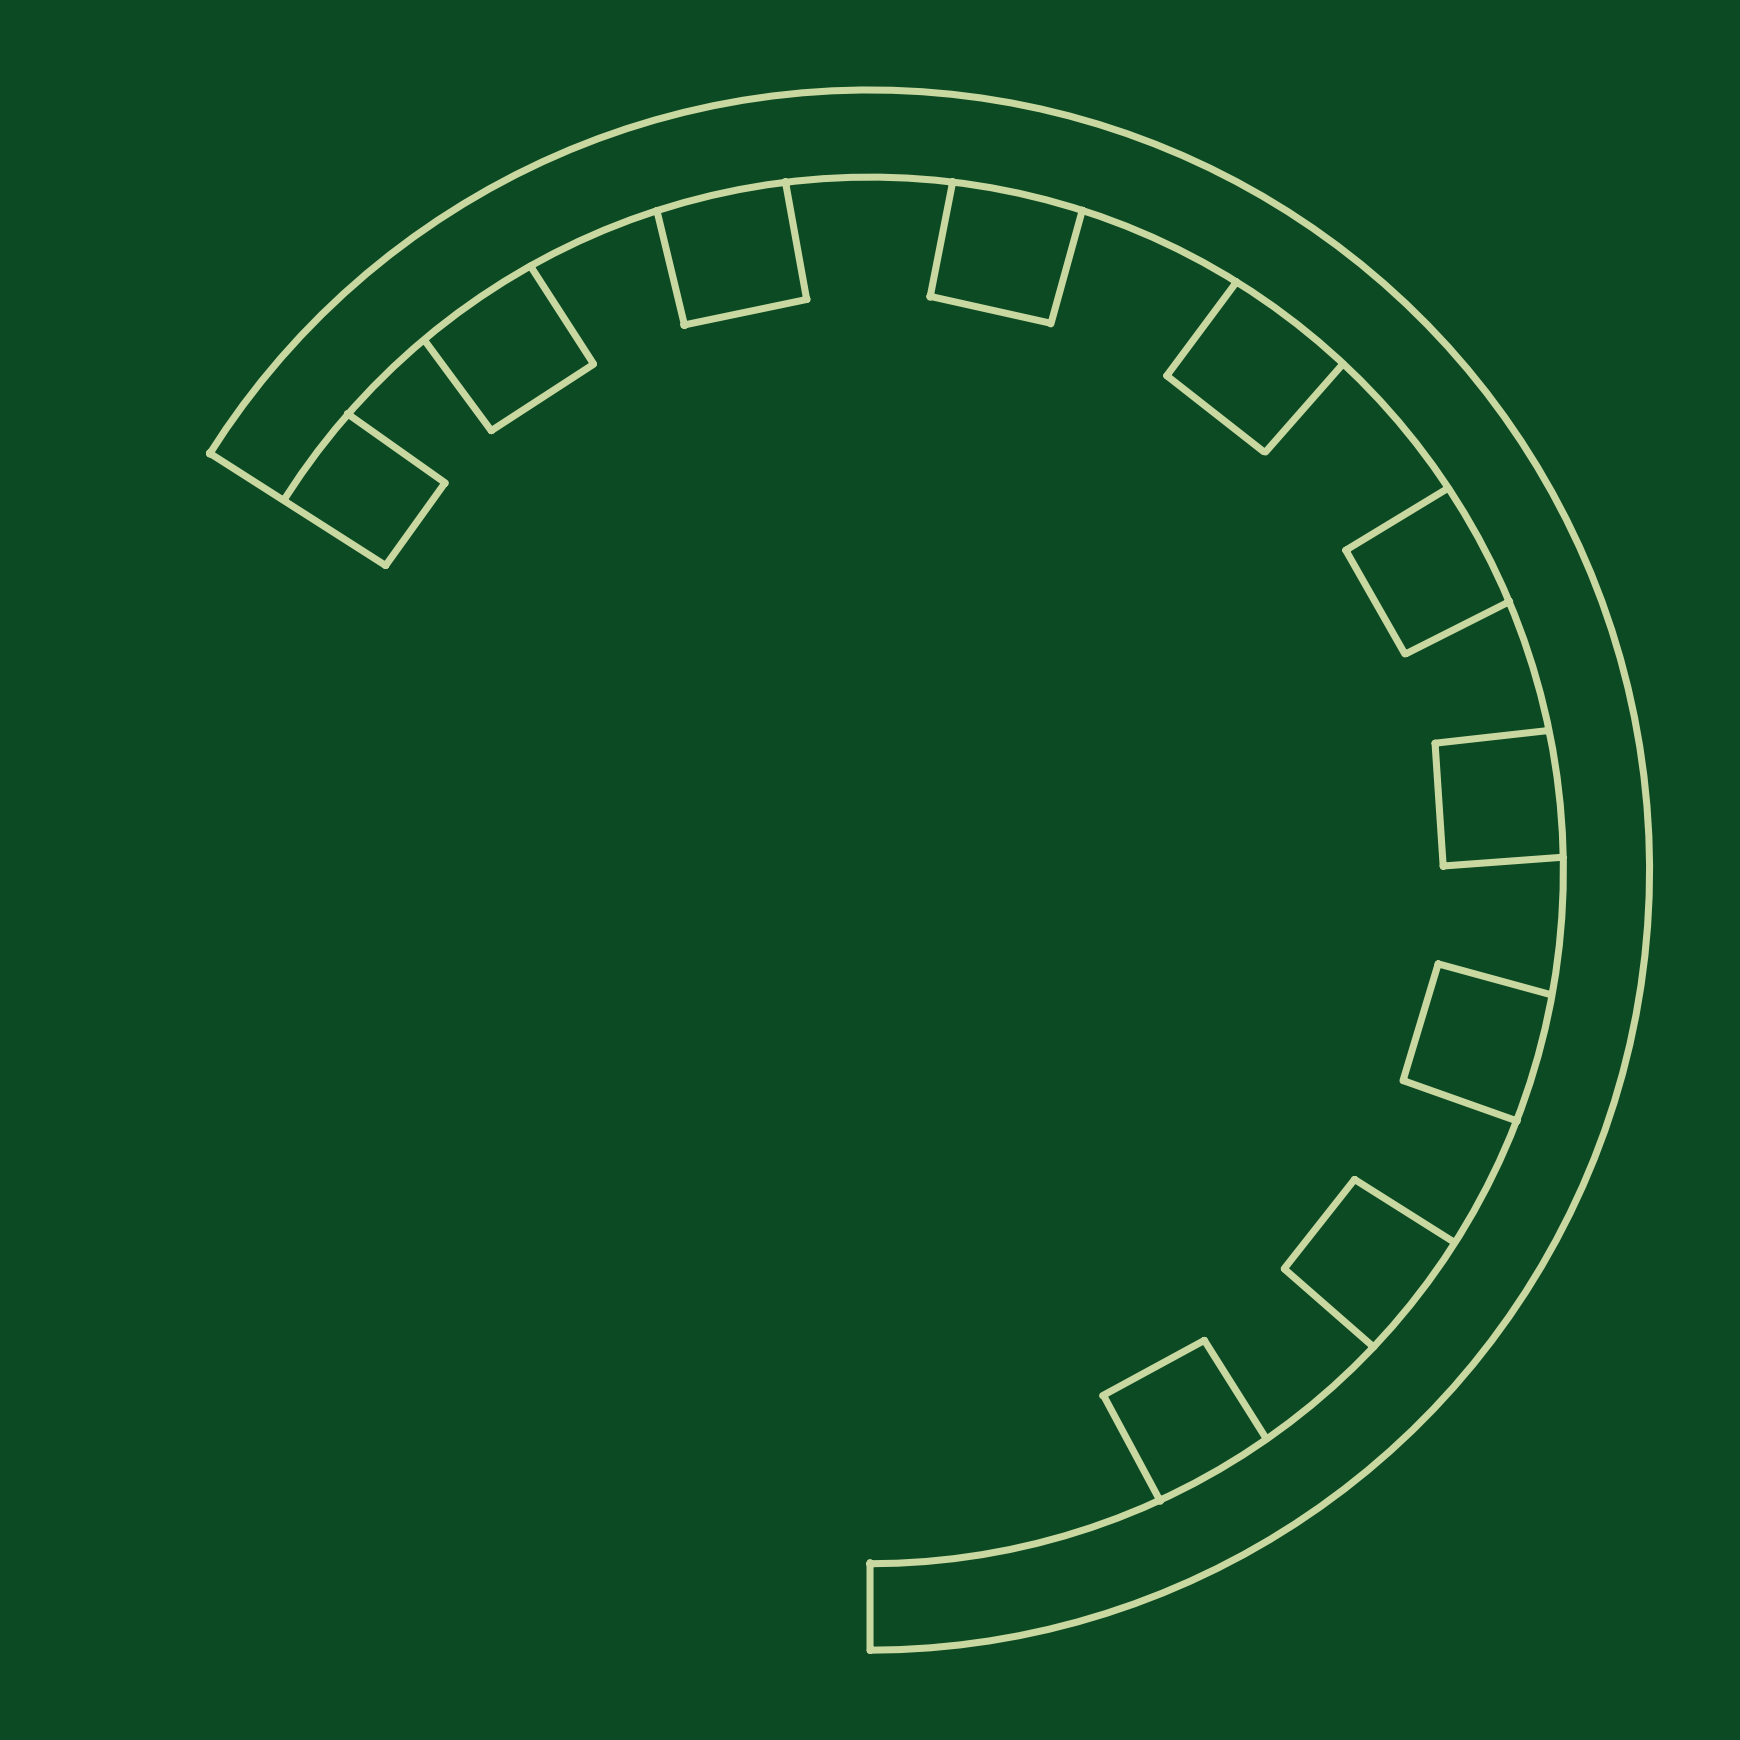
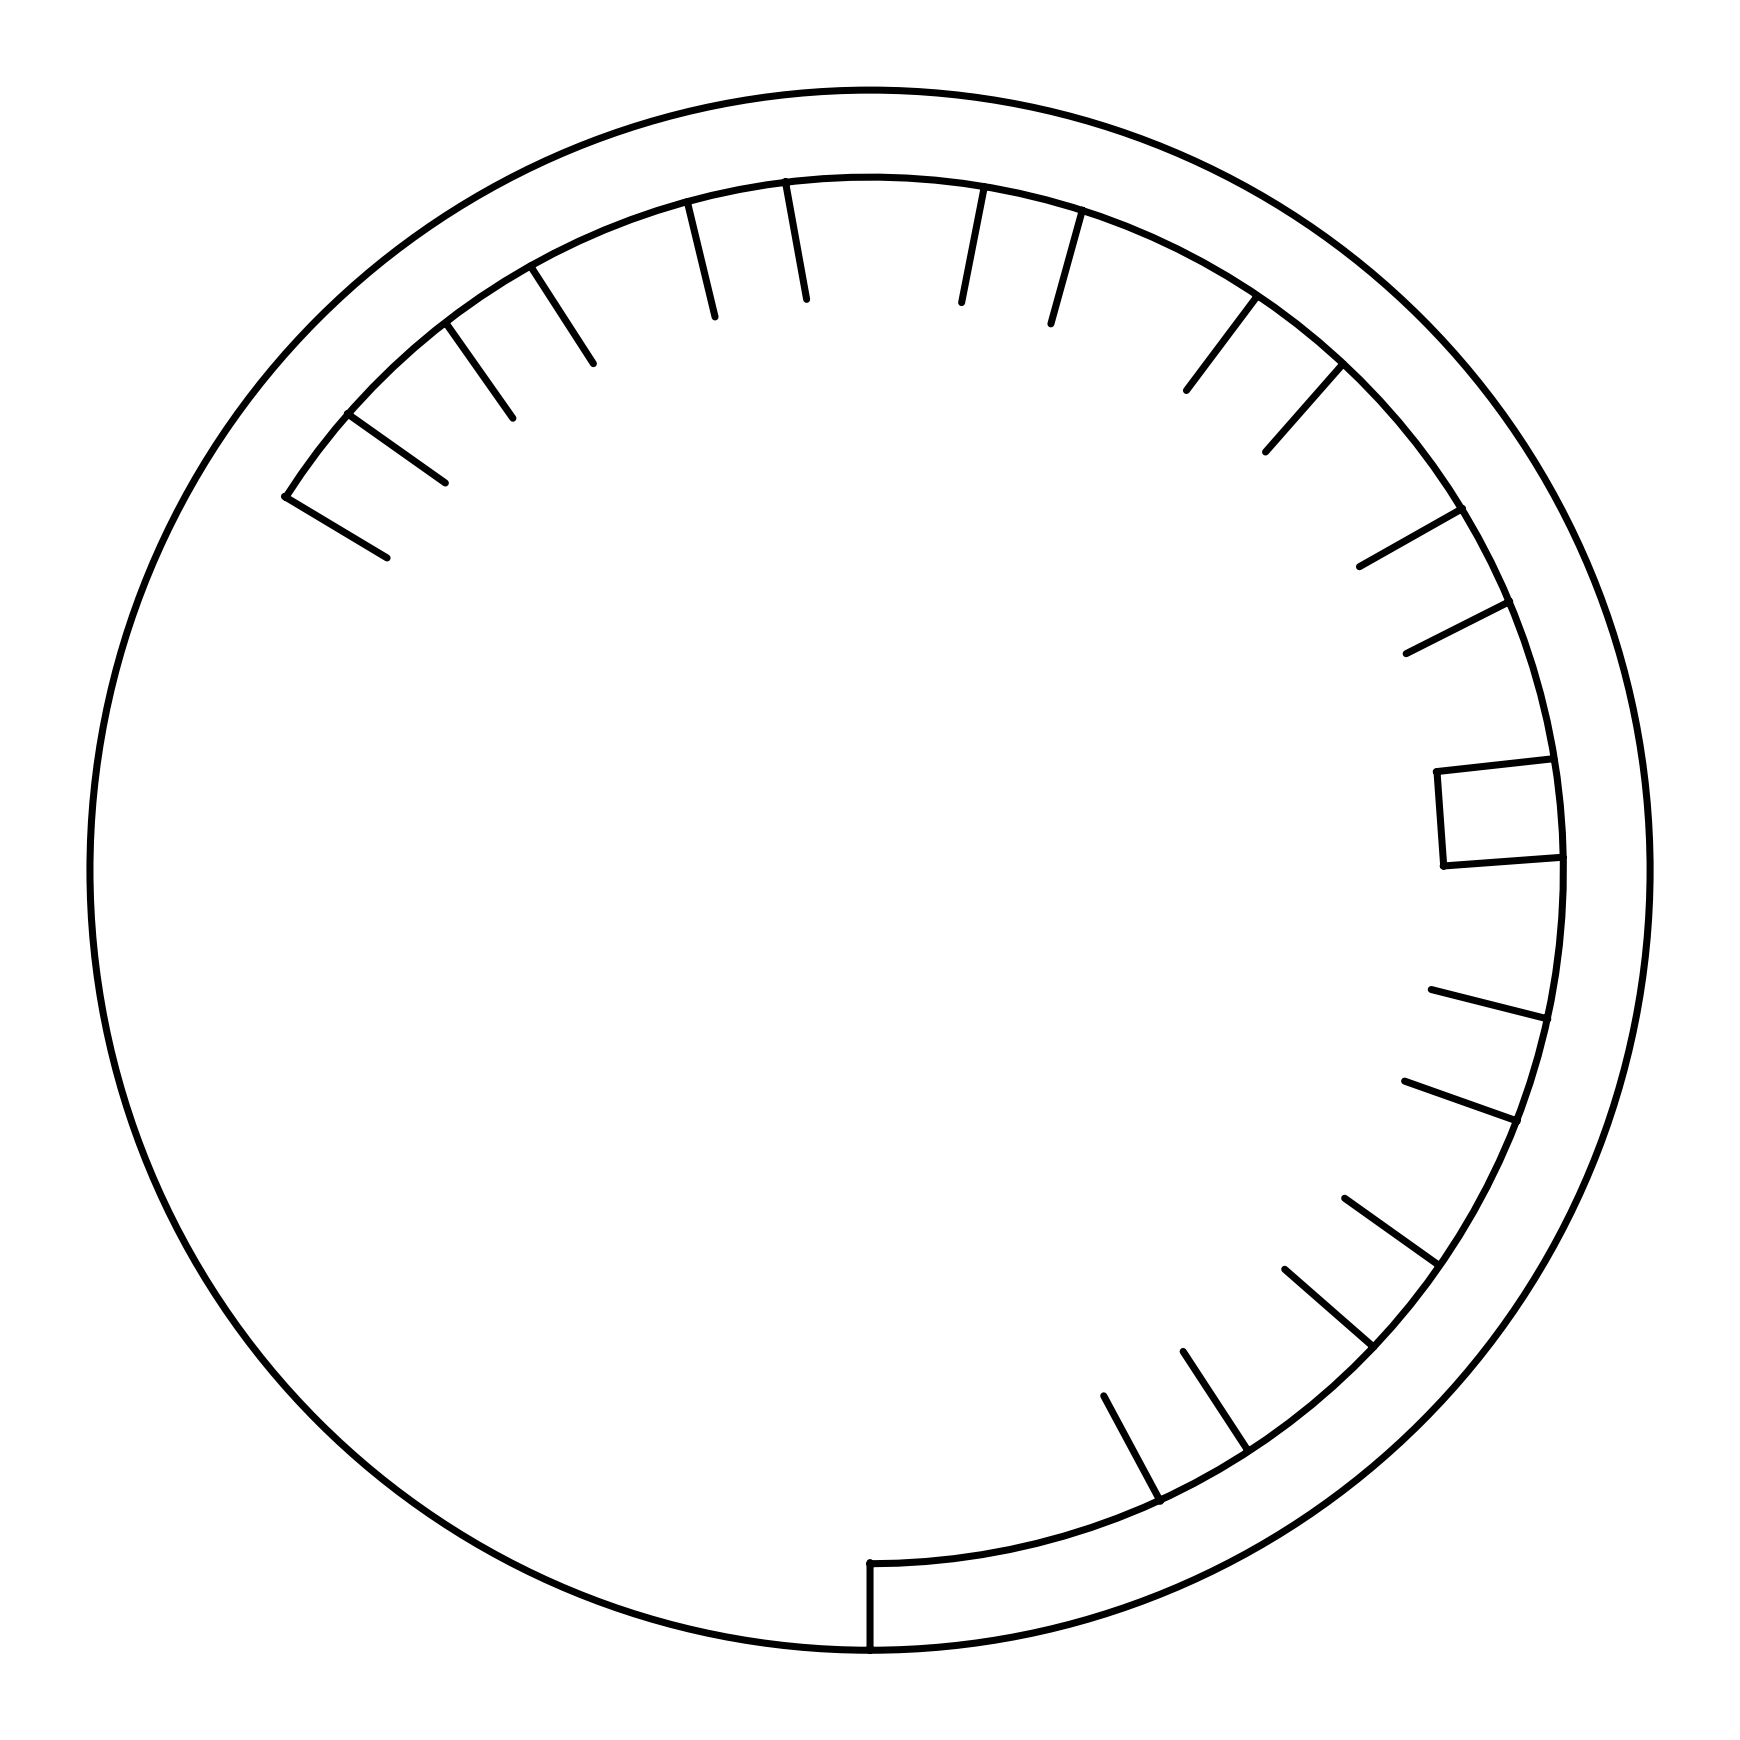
round board edge: none -> [86, 86, 1654, 1654]
board edge: (952, 181) (930, 297) -> (984, 186) (961, 302)
board edge: (656, 210) (684, 325) -> (687, 201) (715, 316)
board edge: (1236, 281) (1166, 375) (1263, 451) -> none
board edge: (929, 296) (1049, 322) -> none
board edge: none -> (1257, 296) (1186, 390)
board edge: (807, 299) (683, 325) -> none
board edge: none -> (445, 322) (512, 418)
board edge: (426, 342) (491, 430) (593, 364) -> none
board edge: (209, 452) (385, 565) (444, 483) -> none
board edge: (209, 454) (243, 404) (280, 357) (343, 293) (413, 237) (463, 203) (515, 174) (598, 138) (684, 112) (742, 100) (802, 92) (891, 90) (951, 94) (1011, 102) (1098, 124) (1182, 155) (1262, 196) (1313, 228) (1361, 264) (1427, 324) (1467, 369) (1504, 416) (1552, 492) (1591, 573) (1620, 658) (1639, 746) (1646, 806) (1649, 865) (1647, 925) (1641, 985) (1622, 1073) (1604, 1130) (1582, 1186) (1541, 1266) (1491, 1340) (1453, 1387) (1412, 1430) (1344, 1489) (1295, 1523) (1243, 1554) (1162, 1593) (1106, 1613) (1048, 1629) (959, 1644) (870, 1650) -> none
board edge: (1446, 489) (1345, 550) (1404, 653) -> none
board edge: none -> (284, 496) (387, 557)
board edge: none -> (1462, 508) (1359, 566)
board edge: (1547, 730) (1435, 743) (1443, 866) -> (1437, 771) (1443, 866)
board edge: none -> (1553, 758) (1436, 771)
board edge: none -> (1431, 989) (1547, 1018)
board edge: (1550, 994) (1438, 963) (1402, 1080) -> none
board edge: none -> (1344, 1198) (1439, 1265)
board edge: (1453, 1241) (1354, 1179) (1284, 1268) -> none
board edge: none -> (1183, 1351) (1248, 1450)
board edge: (1102, 1395) (1204, 1340) (1265, 1437) -> none

